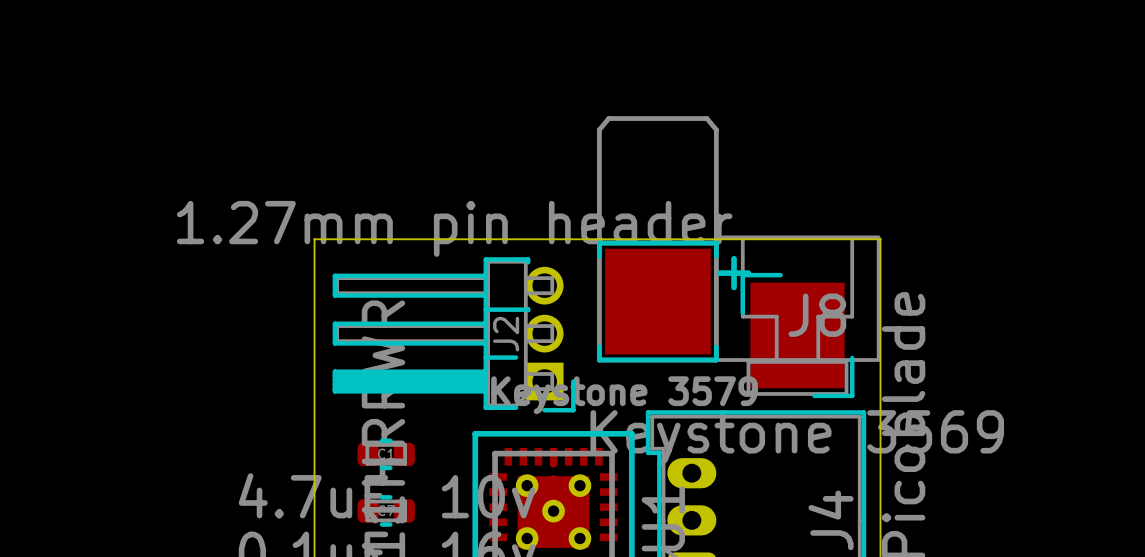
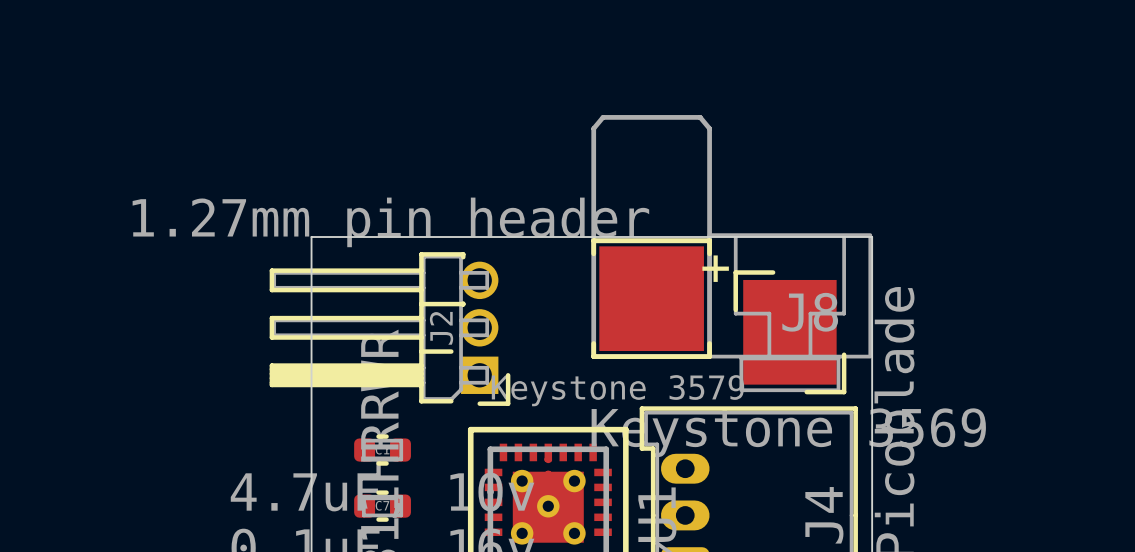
J2 position: (454, 334) -> (390, 329)

